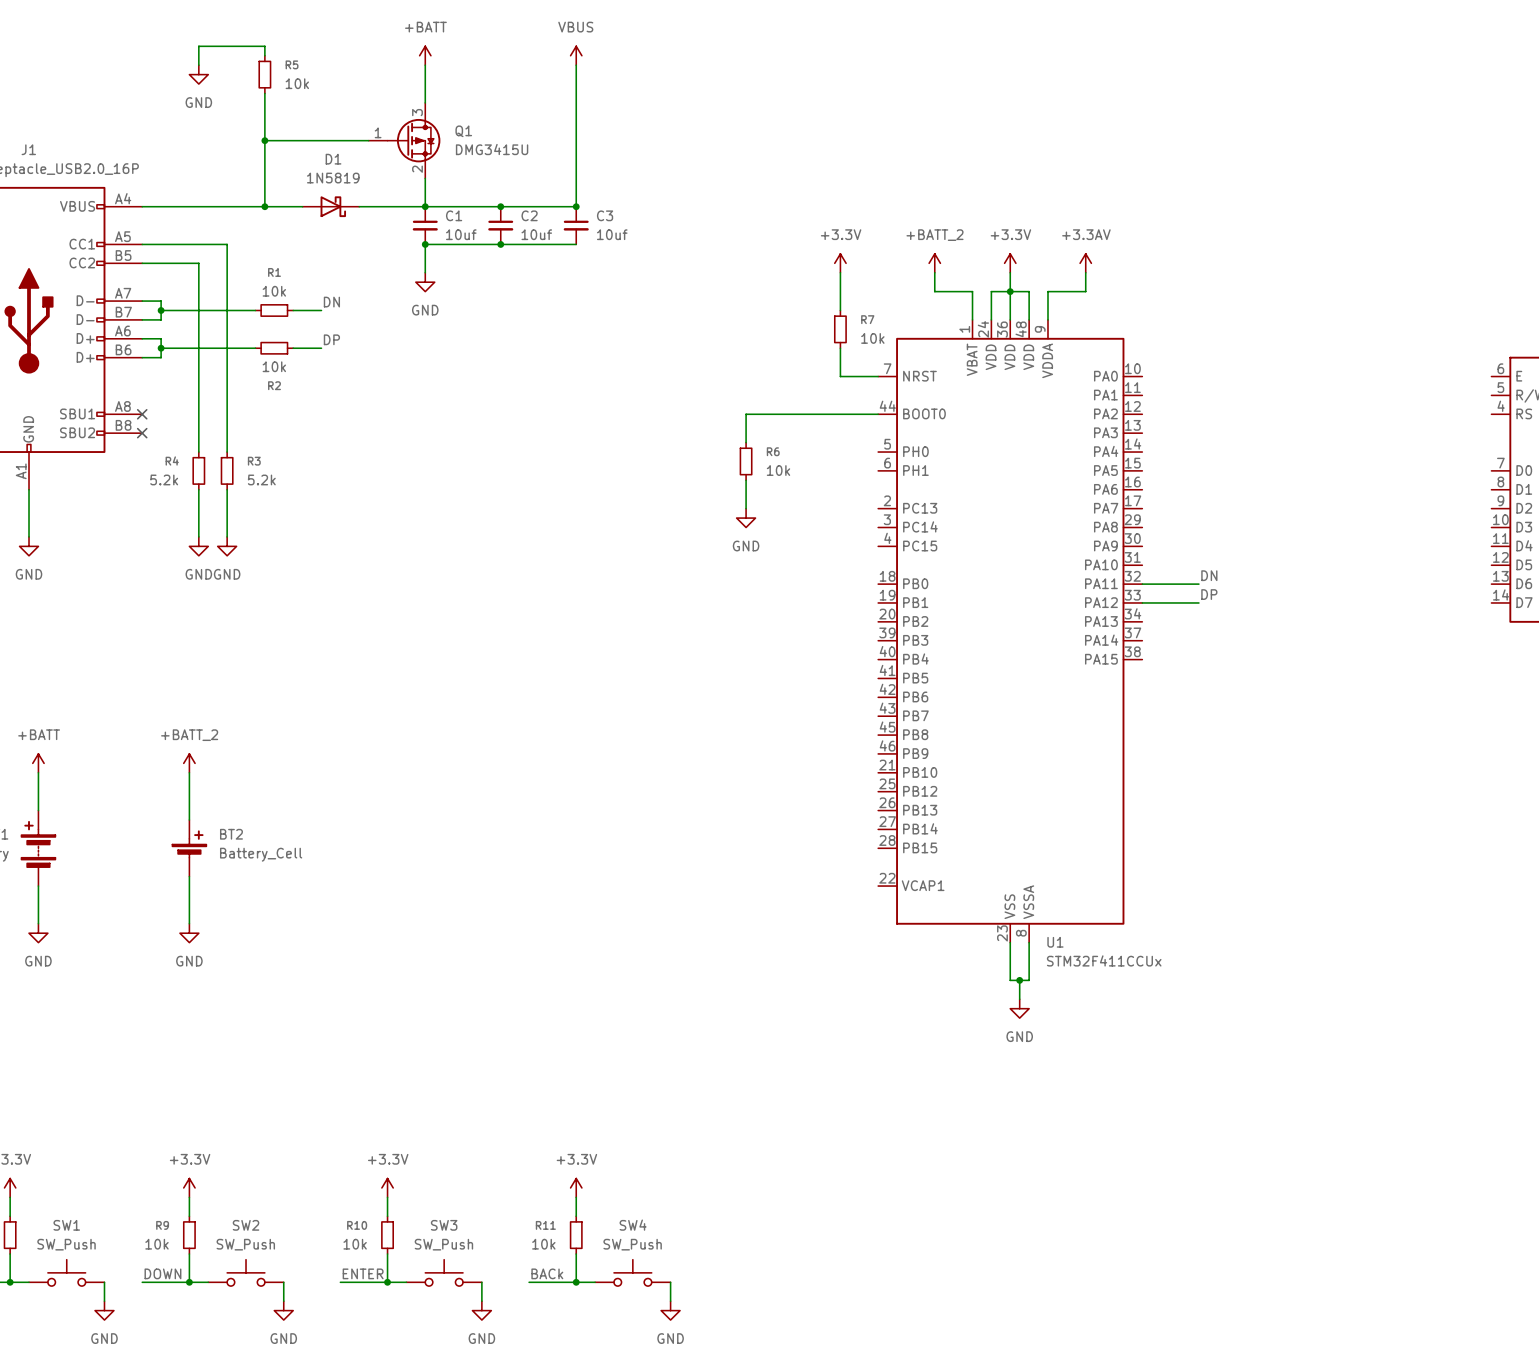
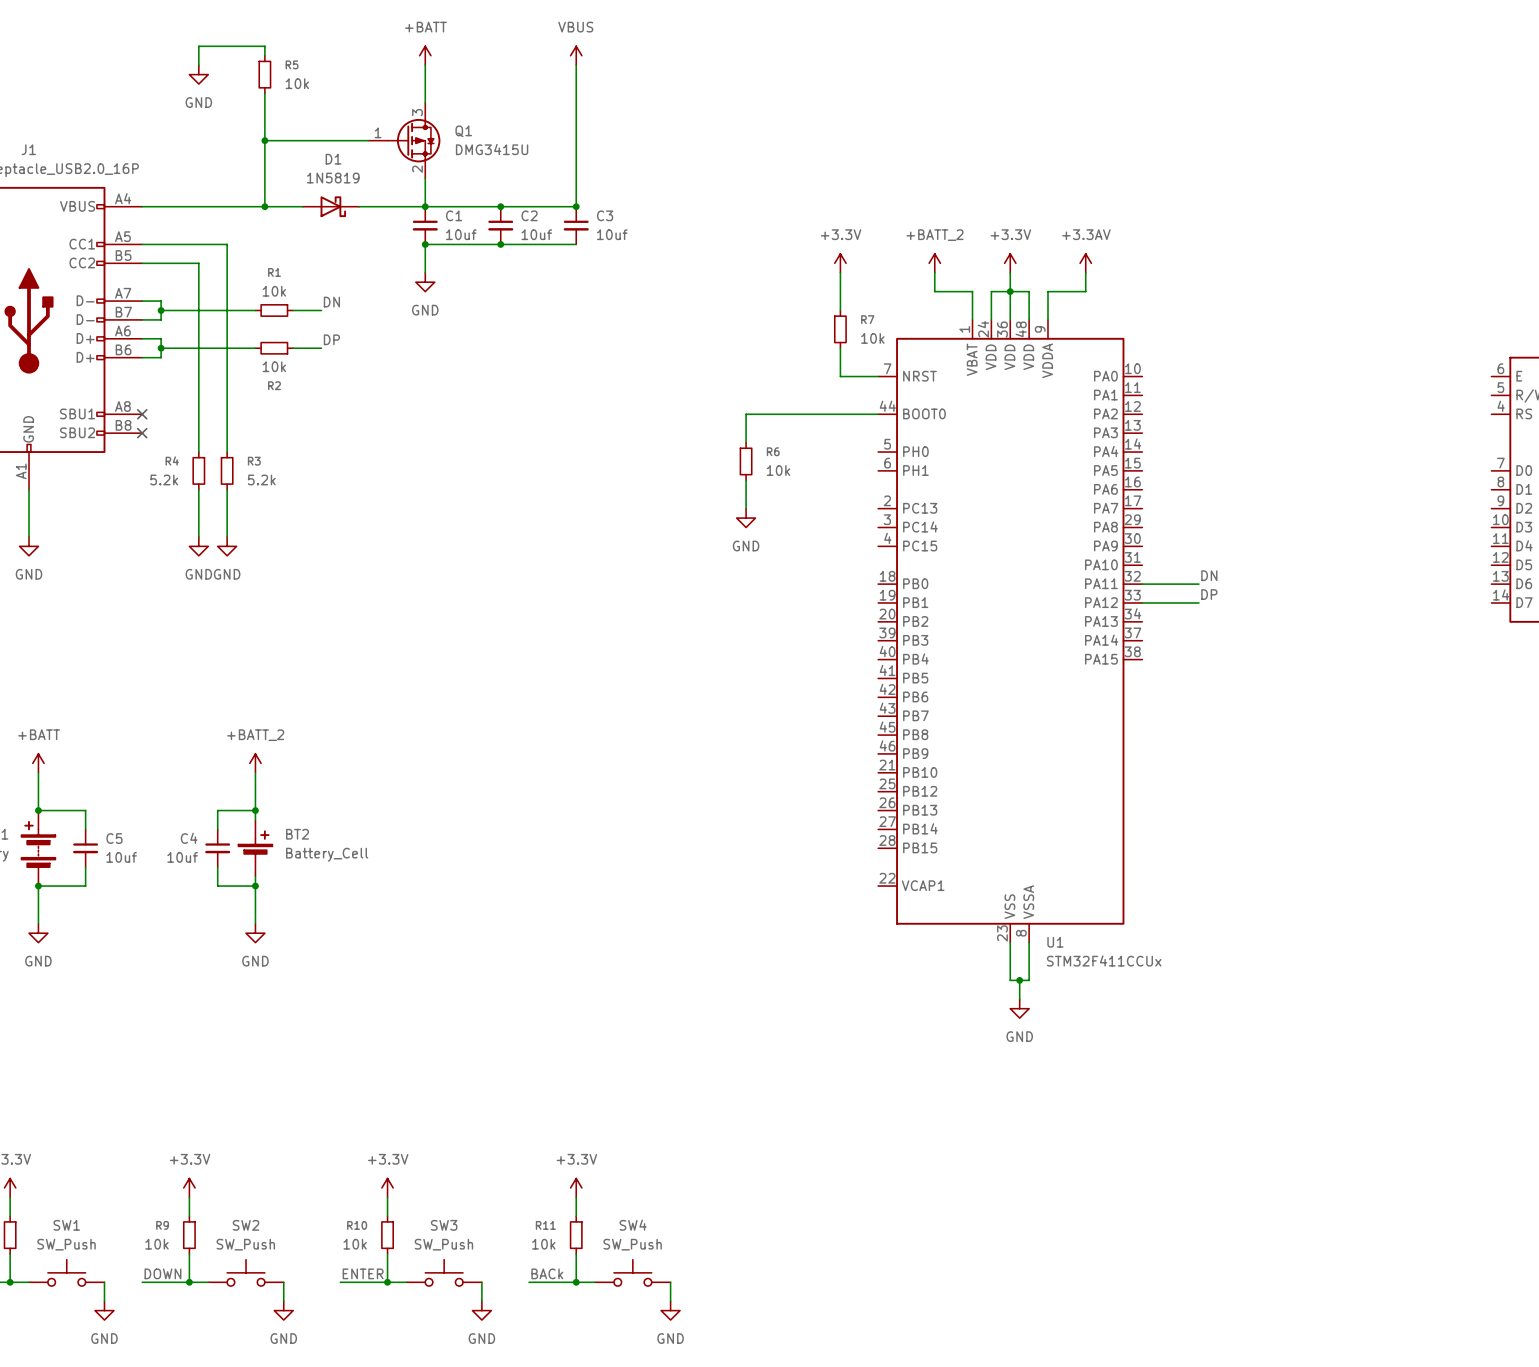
power symbol position: +BATT_2 (189, 763) -> +BATT_2 (255, 763)
wire: (189, 772) (189, 819) -> (255, 772) (255, 819)
wire: none -> (38, 810) (85, 810) (85, 829)
junction: none -> (38, 810)
wire: none -> (255, 810) (217, 810) (217, 829)
junction: none -> (255, 810)
C5: none -> 10uf (85, 848)
BT2 position: (189, 848) -> (255, 848)
C4: none -> 10uf (217, 848)
wire: none -> (85, 867) (85, 886) (38, 886)
wire: none -> (217, 867) (217, 886) (255, 886)
wire: (189, 876) (189, 923) -> (255, 876) (255, 923)
junction: none -> (38, 886)
junction: none -> (255, 886)
power symbol position: GND (189, 933) -> GND (255, 933)

